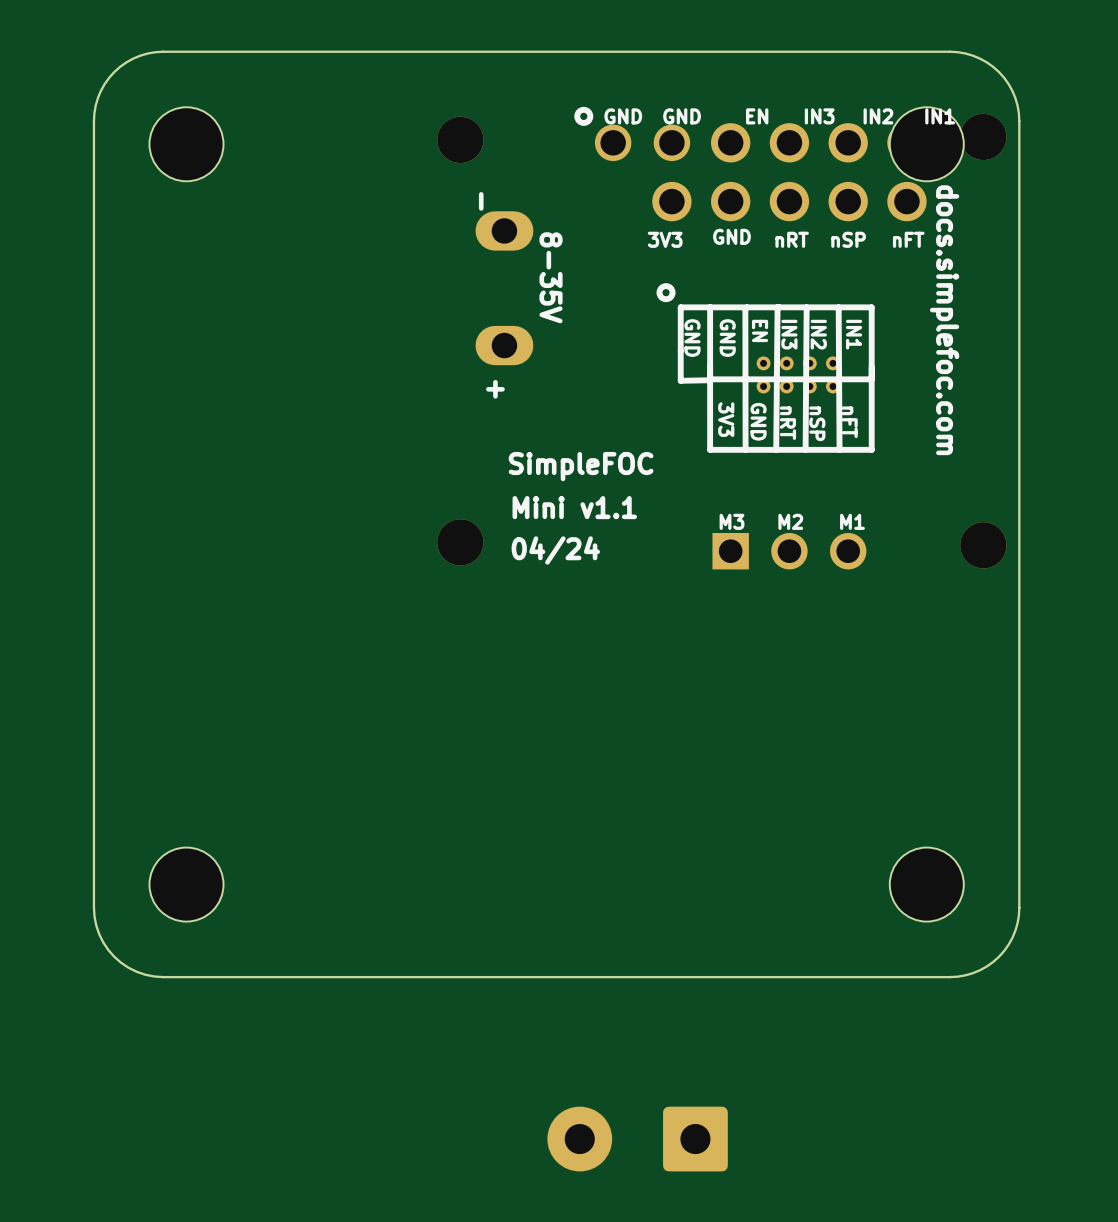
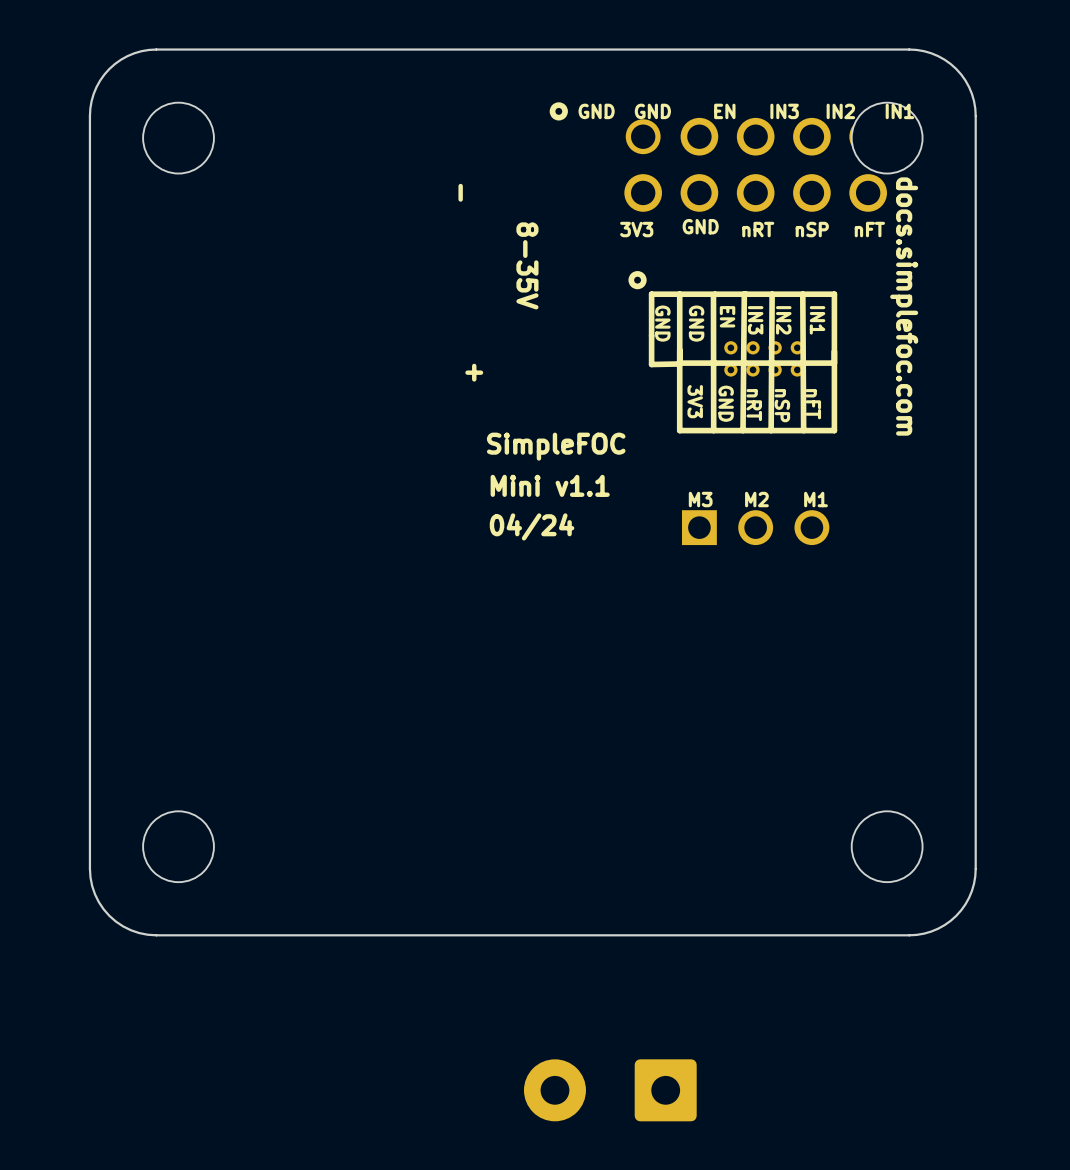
part: (983, 136) -> none
part: (460, 139) -> none
part: (613, 142) -> none
part: (504, 230) -> none
part: (504, 345) -> none
part: (460, 542) -> none
part: (983, 545) -> none

